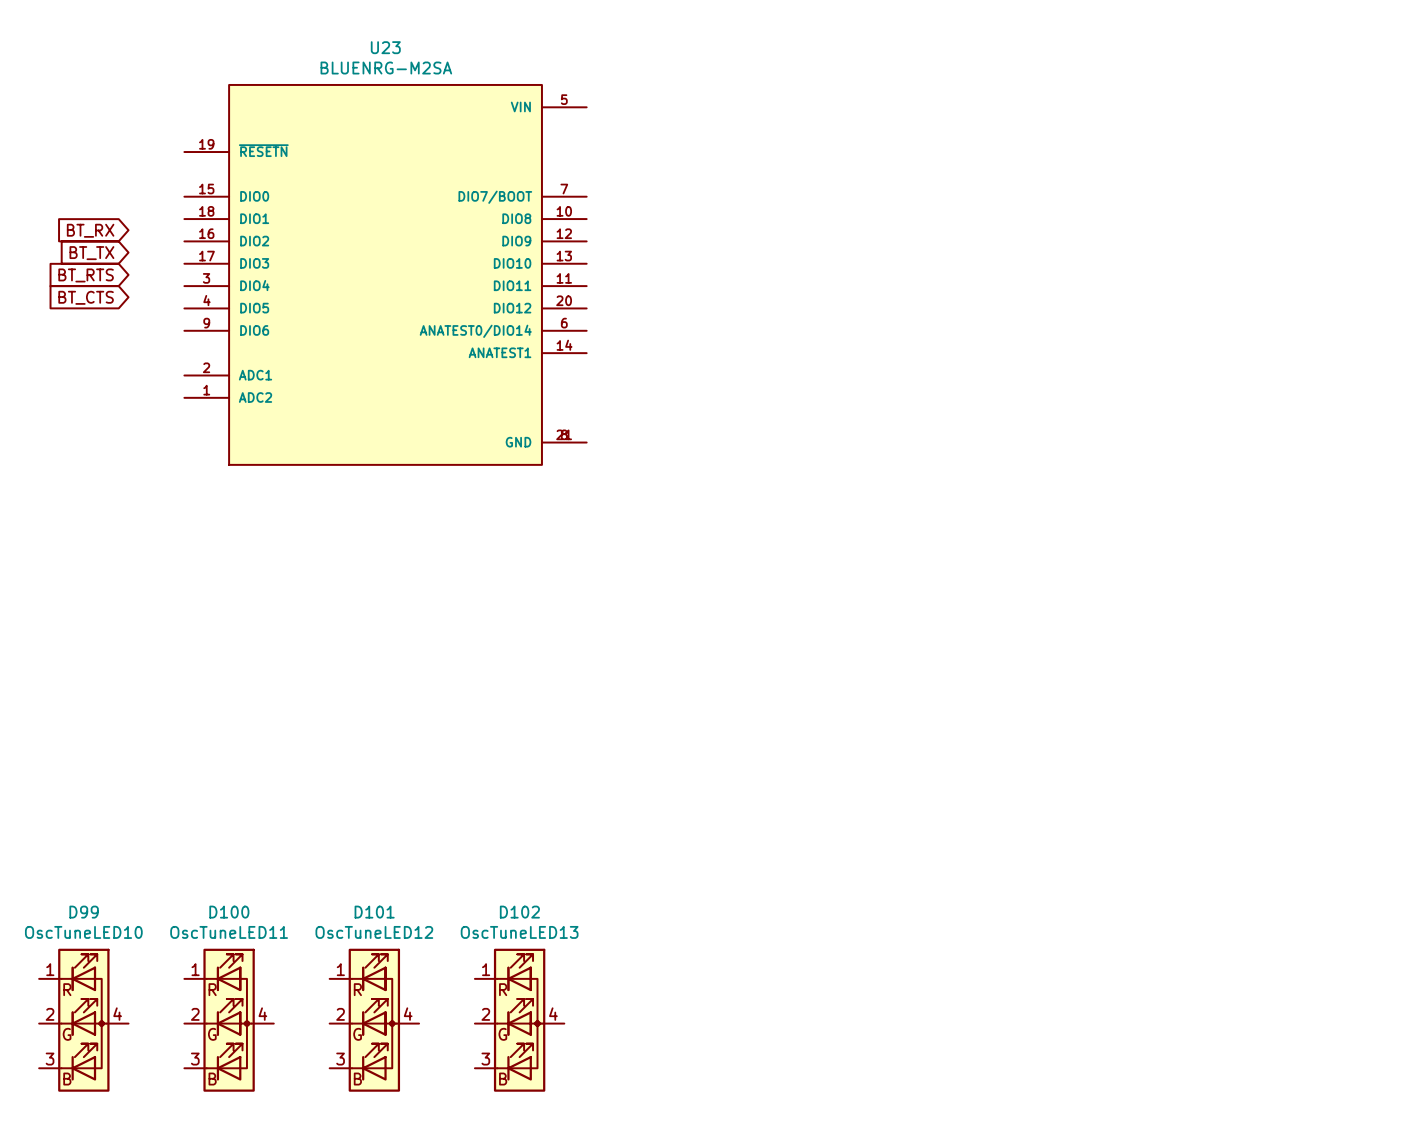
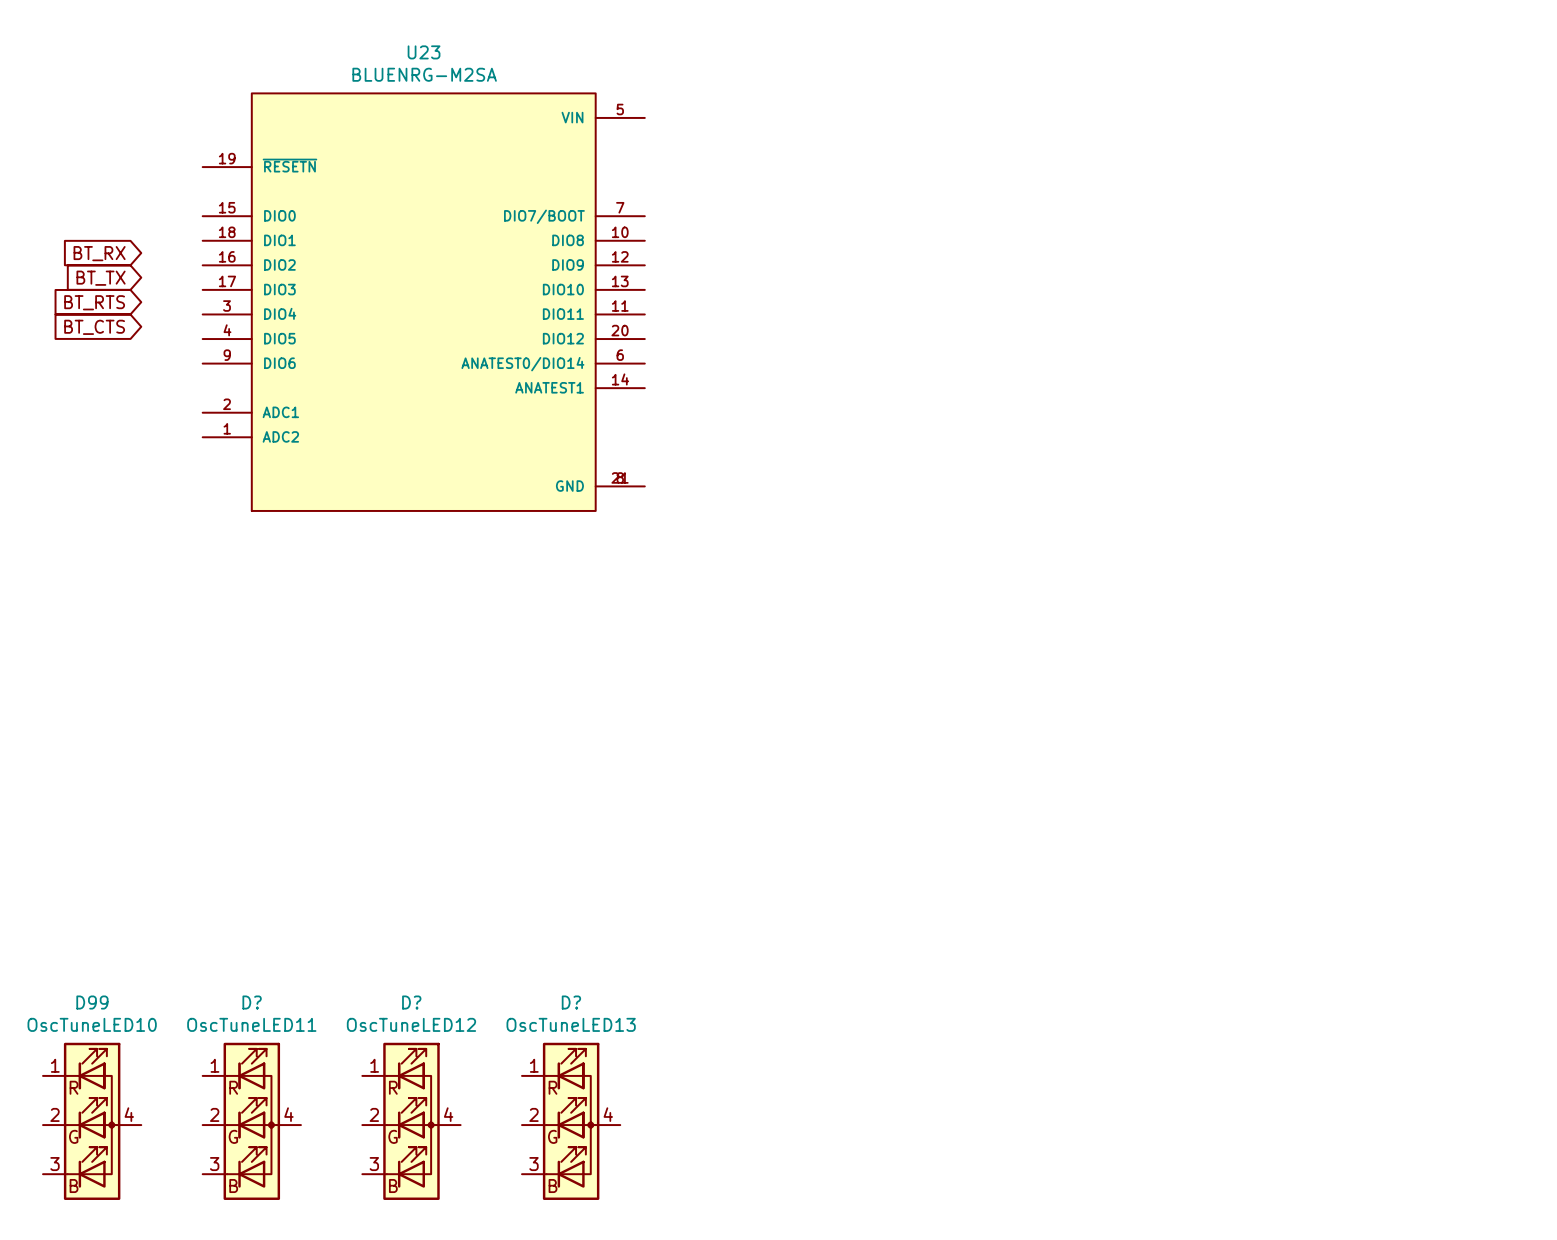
D100 name: D100 (229, 912) -> D? (252, 1002)
D101 name: D101 (374, 912) -> D? (411, 1002)
D102 name: D102 (519, 912) -> D? (571, 1002)

